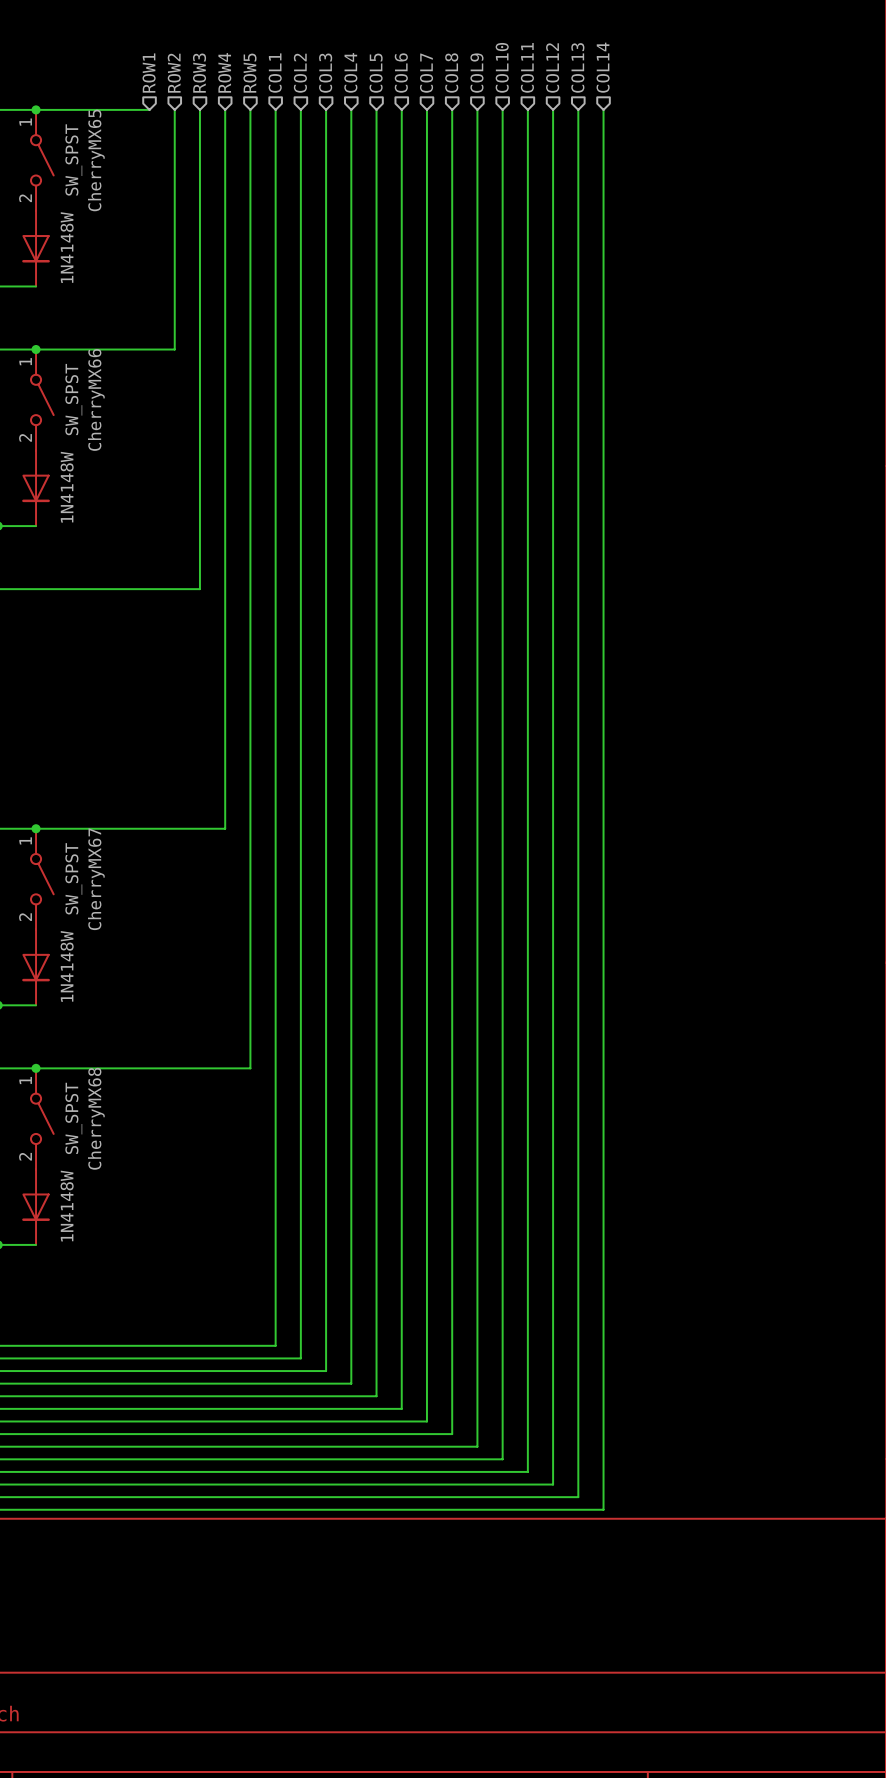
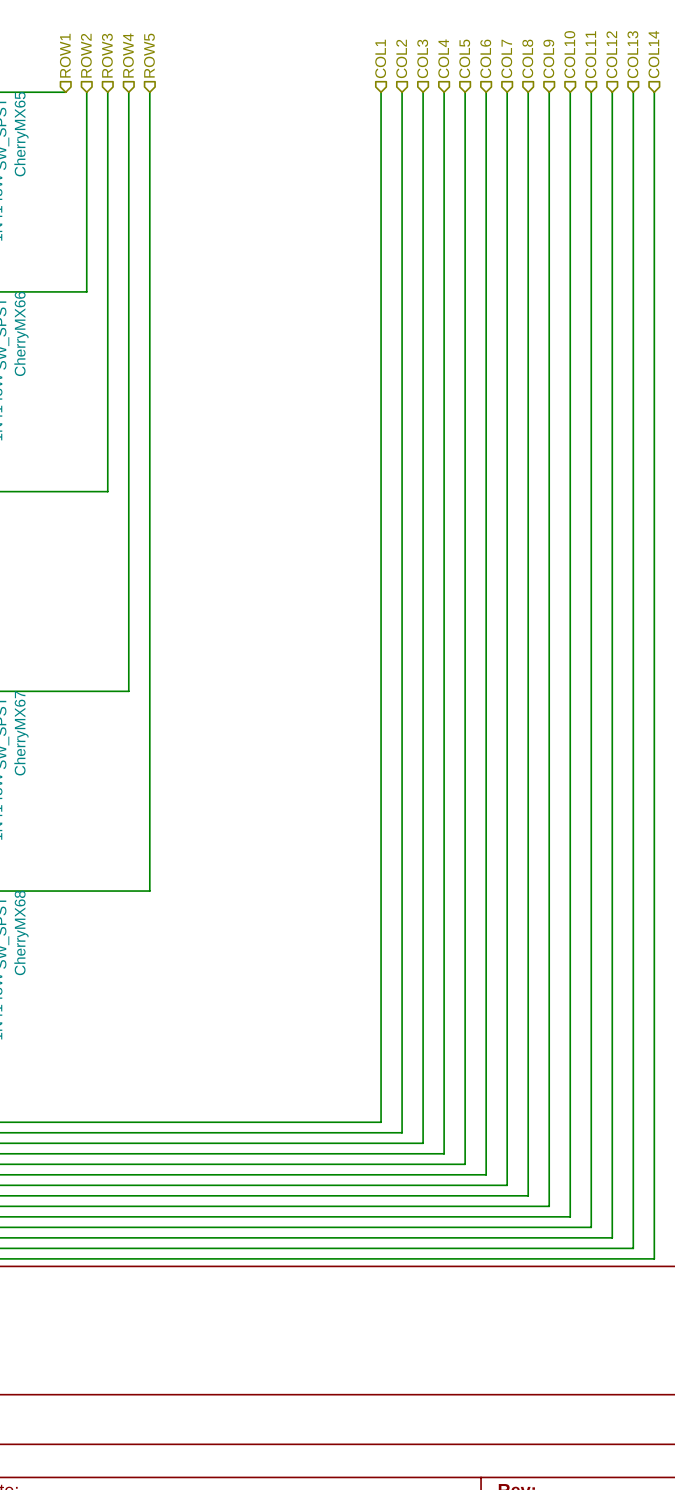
hierarchical label: COL10 (502, 67) -> none
hierarchical label: COL11 (527, 67) -> COL1 (380, 58)
hierarchical label: COL13 (577, 67) -> COL3 (422, 58)
hierarchical label: COL14 (603, 67) -> COL4 (443, 58)
hierarchical label: none -> COL10 (569, 54)
hierarchical label: none -> COL11 (590, 54)
hierarchical label: none -> COL13 (632, 54)
hierarchical label: none -> COL14 (653, 54)
hierarchical label: COL12 (552, 68) -> COL2 (401, 58)
hierarchical label: none -> COL12 (611, 54)
hierarchical label: COL4 (350, 72) -> none
hierarchical label: COL1 (275, 73) -> none
hierarchical label: COL2 (300, 73) -> none
hierarchical label: COL3 (325, 73) -> none
hierarchical label: COL5 (376, 73) -> none
hierarchical label: COL6 (401, 73) -> none
hierarchical label: COL7 (426, 73) -> none
hierarchical label: COL8 (451, 73) -> none
hierarchical label: COL9 (476, 73) -> none
hierarchical label: none -> COL5 (464, 58)
hierarchical label: none -> COL6 (485, 58)
hierarchical label: none -> COL7 (506, 58)
hierarchical label: none -> COL8 (527, 58)
hierarchical label: none -> COL9 (548, 58)
wire: (275, 109) (275, 1345) -> none
wire: (300, 109) (300, 1358) -> none
wire: (326, 109) (326, 1371) -> none
wire: (351, 109) (351, 1383) -> none
wire: (376, 109) (376, 1396) -> (465, 92) (465, 1164) (254, 1164)
wire: (401, 109) (401, 1408) -> (486, 92) (486, 1174) (275, 1174)
wire: (426, 109) (426, 1421) -> (507, 92) (507, 1185) (296, 1185)
wire: (452, 109) (452, 1434) -> (528, 92) (528, 1195) (317, 1195)
wire: (477, 109) (477, 1446) -> (549, 92) (549, 1206) (339, 1206)
wire: (502, 109) (502, 1459) -> (570, 92) (570, 1216) (360, 1216)
wire: none -> (591, 92) (591, 1227) (381, 1227)
wire: none -> (612, 92) (612, 1237) (402, 1237)
wire: none -> (633, 92) (633, 1248) (423, 1248)
wire: none -> (654, 92) (654, 1258) (444, 1258)
wire: (527, 1345) (527, 1471) -> (381, 1122) (170, 1122)
wire: (553, 1358) (553, 1484) -> (402, 1132) (191, 1132)
wire: (578, 1371) (578, 1497) -> (423, 1143) (212, 1143)
wire: (603, 1383) (603, 1509) -> (444, 1153) (233, 1153)

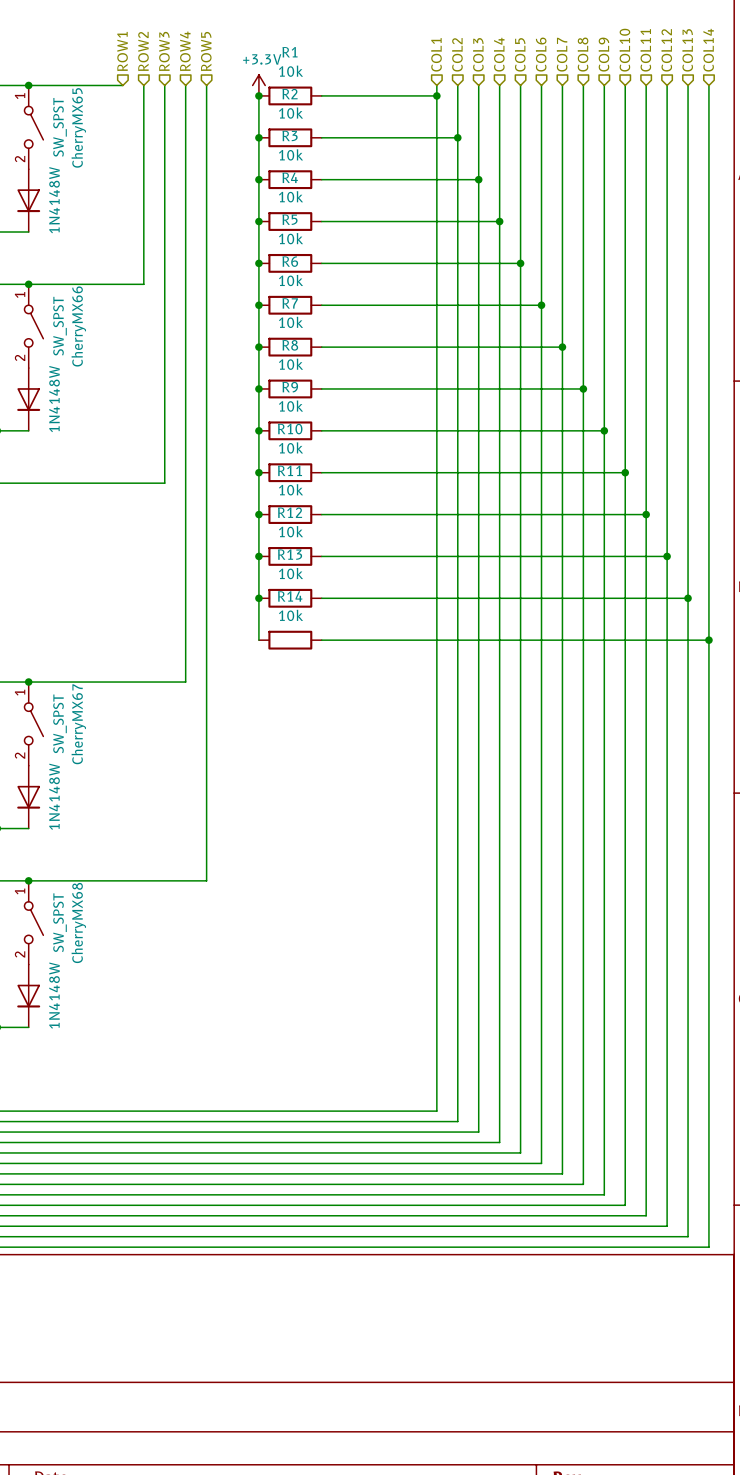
power symbol: none -> +3.3V (258, 85)
wire: none -> (258, 95) (258, 640)
junction: none -> (258, 95)
R1: none -> 10k (290, 95)
wire: none -> (321, 95) (436, 95)
junction: none -> (436, 95)
junction: none -> (258, 137)
R2: none -> 10k (290, 137)
wire: none -> (321, 137) (457, 137)
junction: none -> (457, 137)
junction: none -> (258, 179)
R3: none -> 10k (290, 179)
wire: none -> (321, 179) (478, 179)
junction: none -> (478, 179)
junction: none -> (258, 221)
R4: none -> 10k (290, 221)
wire: none -> (321, 221) (499, 221)
junction: none -> (499, 221)
junction: none -> (258, 263)
R5: none -> 10k (290, 263)
wire: none -> (321, 263) (520, 263)
junction: none -> (520, 263)
junction: none -> (258, 305)
R6: none -> 10k (290, 305)
wire: none -> (321, 305) (541, 305)
junction: none -> (541, 305)
junction: none -> (258, 347)
R7: none -> 10k (290, 347)
wire: none -> (321, 347) (562, 347)
junction: none -> (562, 347)
junction: none -> (258, 388)
R8: none -> 10k (290, 388)
wire: none -> (321, 388) (583, 388)
junction: none -> (583, 388)
junction: none -> (258, 430)
R9: none -> 10k (290, 430)
wire: none -> (321, 430) (604, 430)
junction: none -> (604, 430)
junction: none -> (258, 472)
R10: none -> 10k (290, 472)
wire: none -> (321, 472) (625, 472)
junction: none -> (625, 472)
junction: none -> (258, 514)
R11: none -> 10k (290, 514)
wire: none -> (321, 514) (646, 514)
junction: none -> (646, 514)
junction: none -> (258, 556)
R12: none -> 10k (290, 556)
wire: none -> (321, 556) (667, 556)
junction: none -> (667, 556)
junction: none -> (258, 598)
R13: none -> 10k (290, 598)
wire: none -> (321, 598) (688, 598)
junction: none -> (688, 598)
R14: none -> 10k (290, 640)
wire: none -> (321, 640) (708, 640)
junction: none -> (708, 640)

